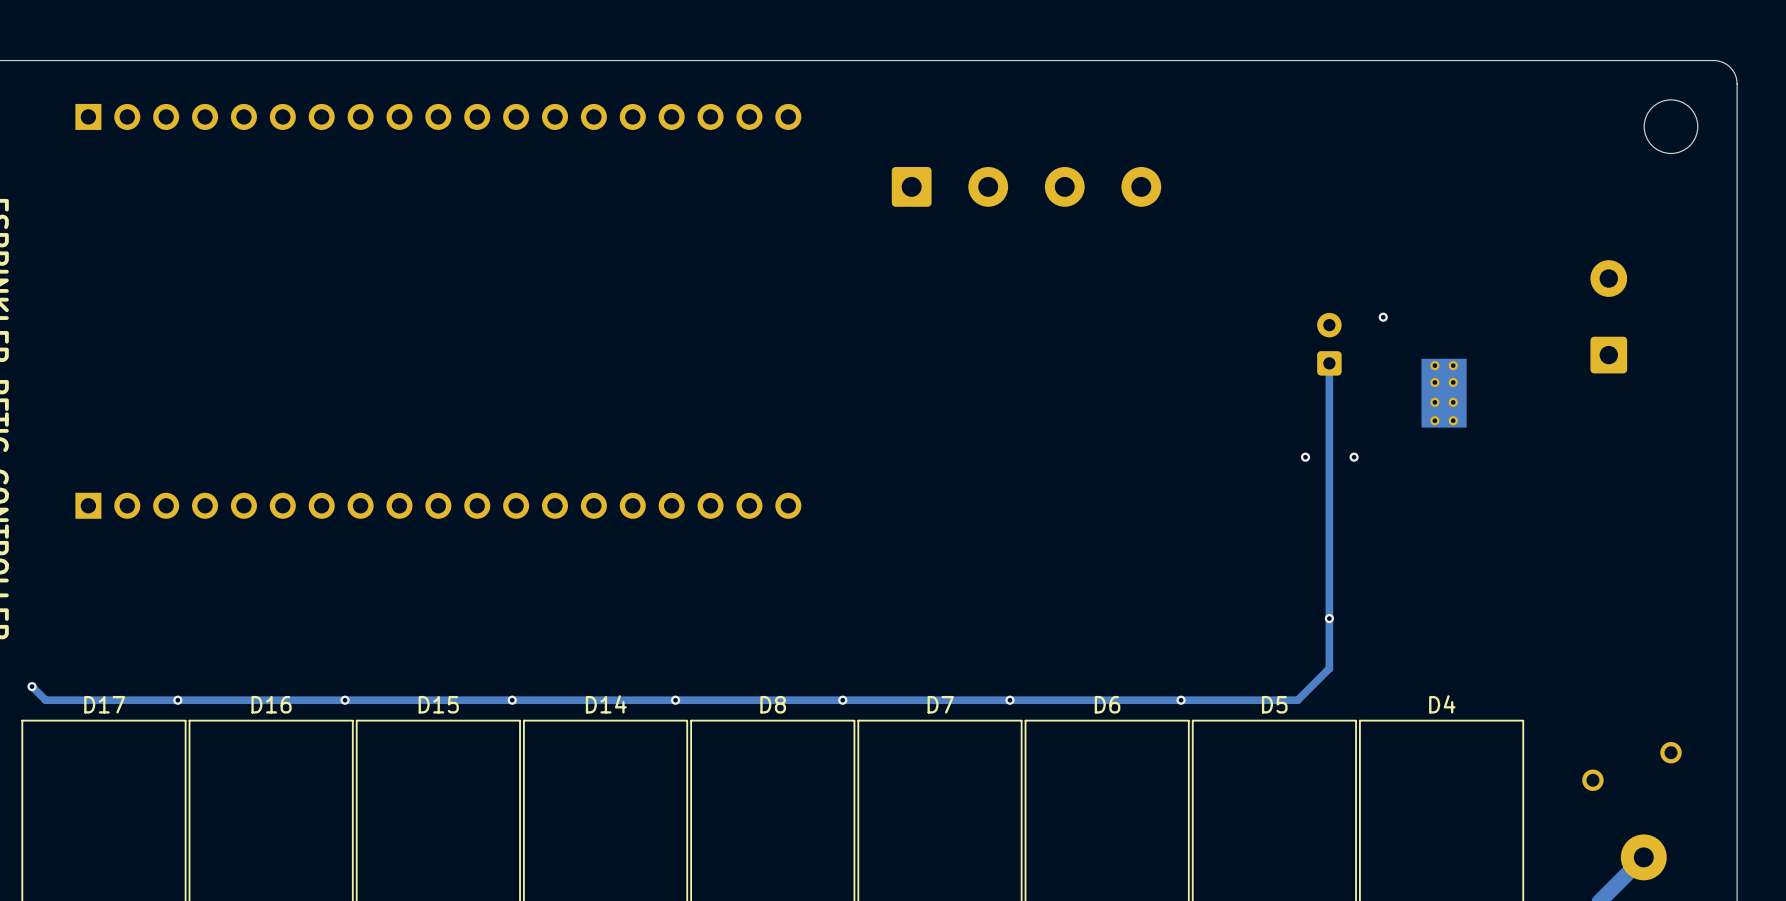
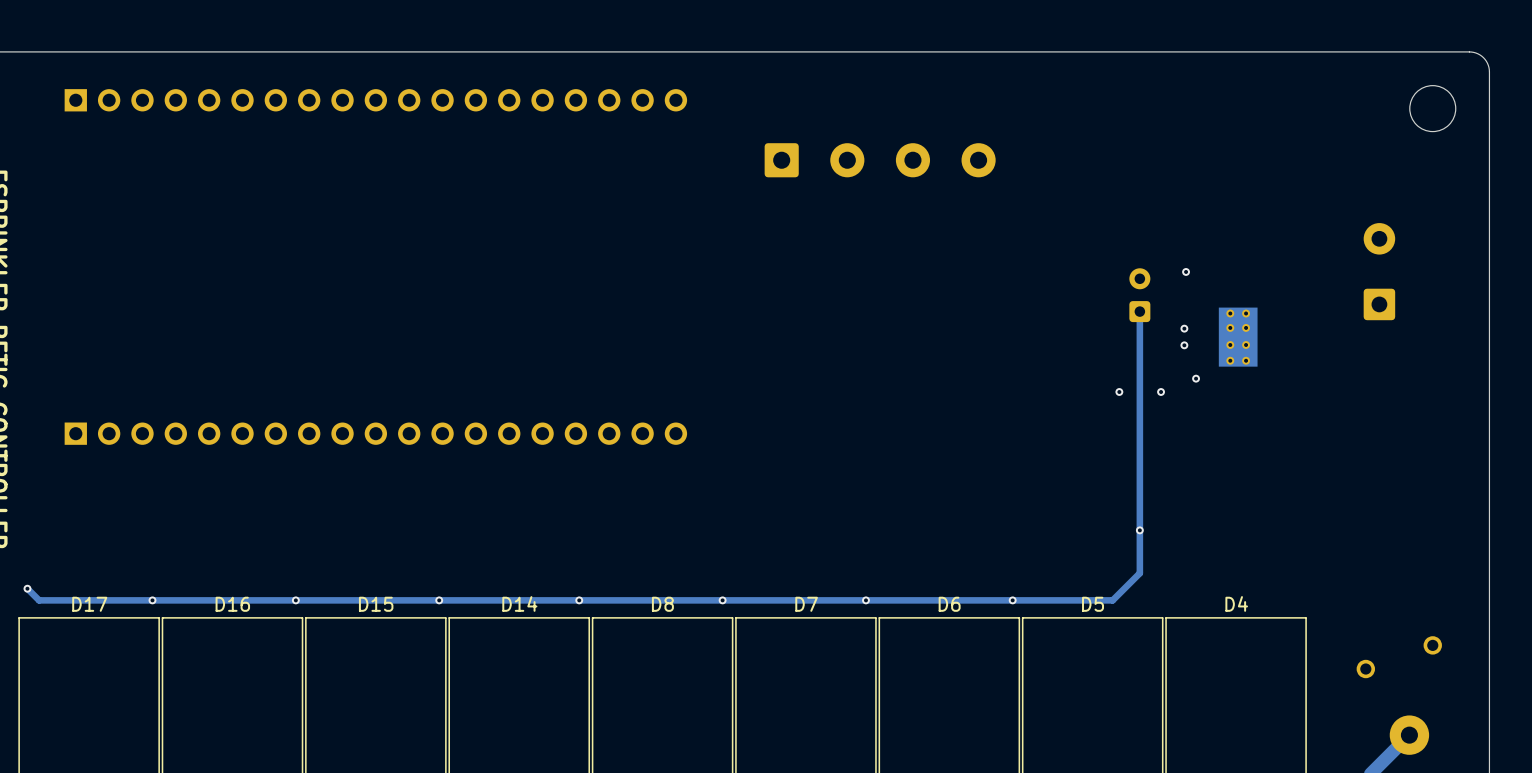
via: none -> (1184, 328)
via: none -> (1184, 345)
via: none -> (1196, 378)

